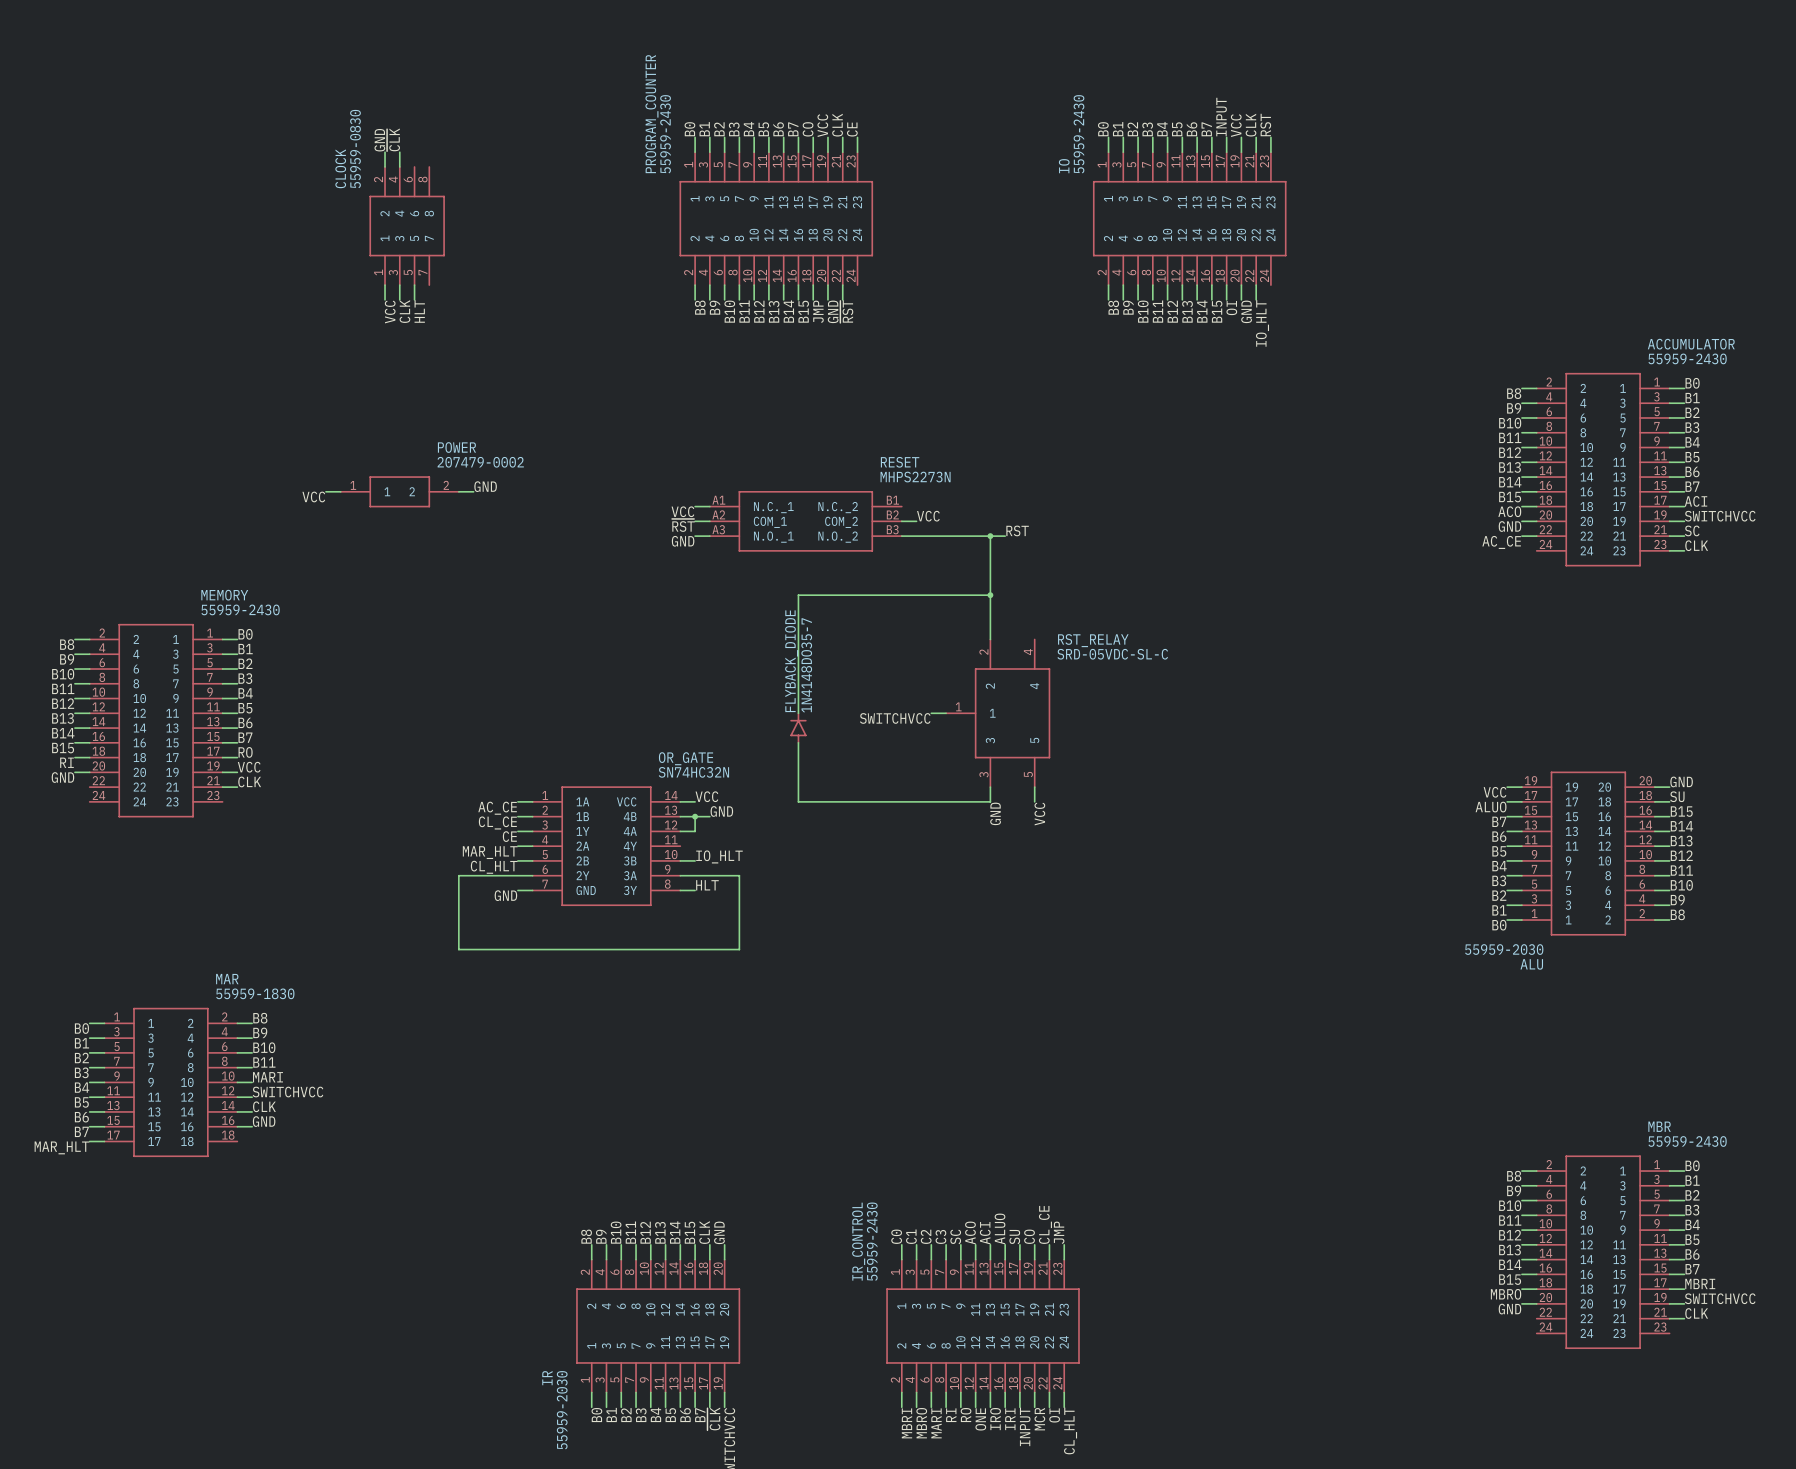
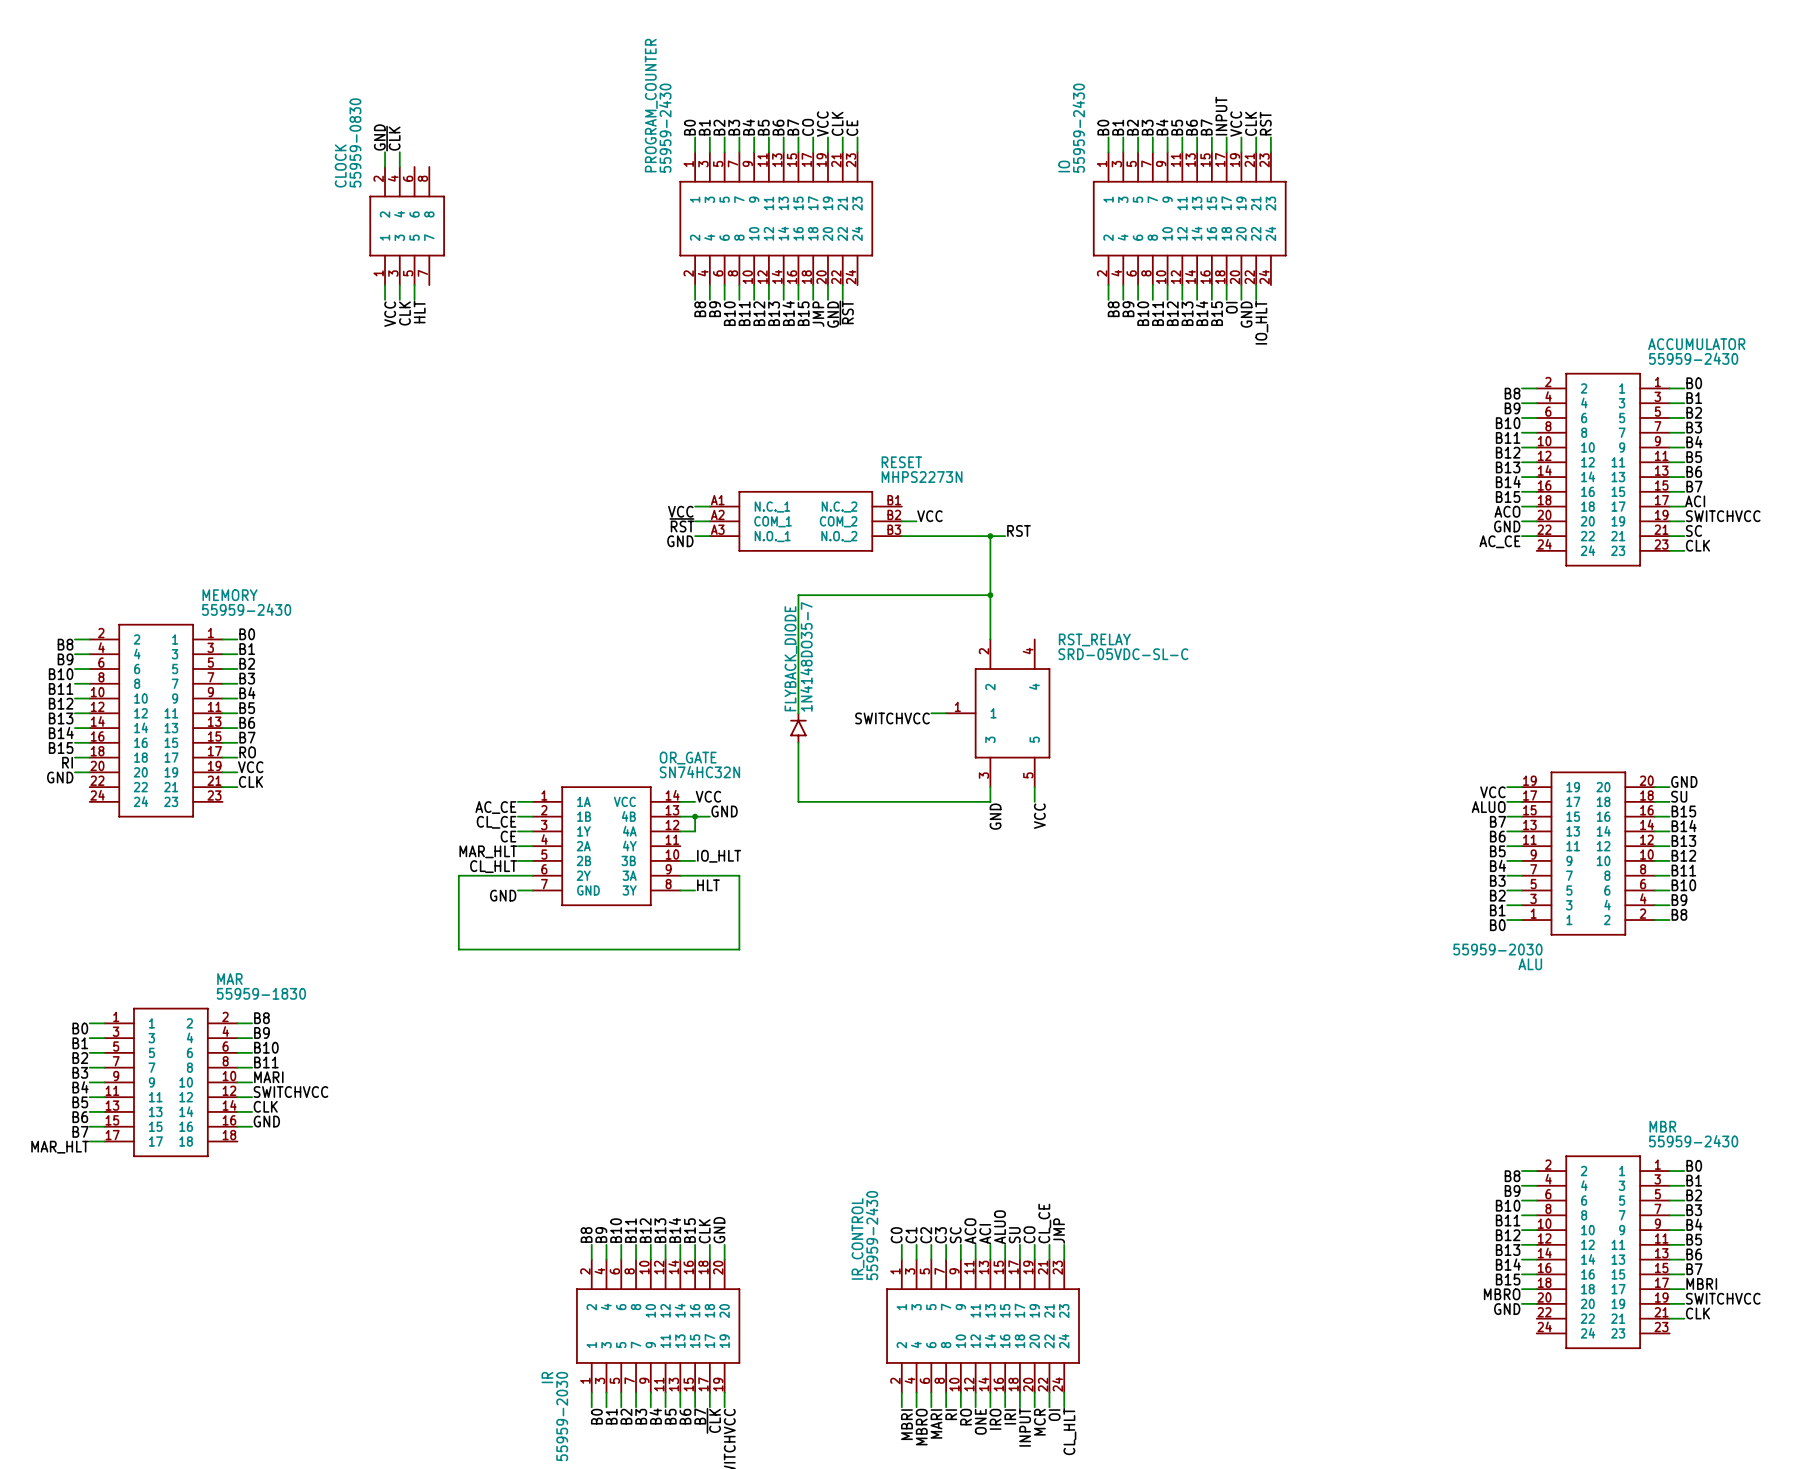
label: GND (485, 486) -> none
wire: (325, 491) (340, 491) -> none
POWER: 207479-0002 (399, 491) -> none
wire: (458, 491) (473, 491) -> none
label: VCC (313, 496) -> none

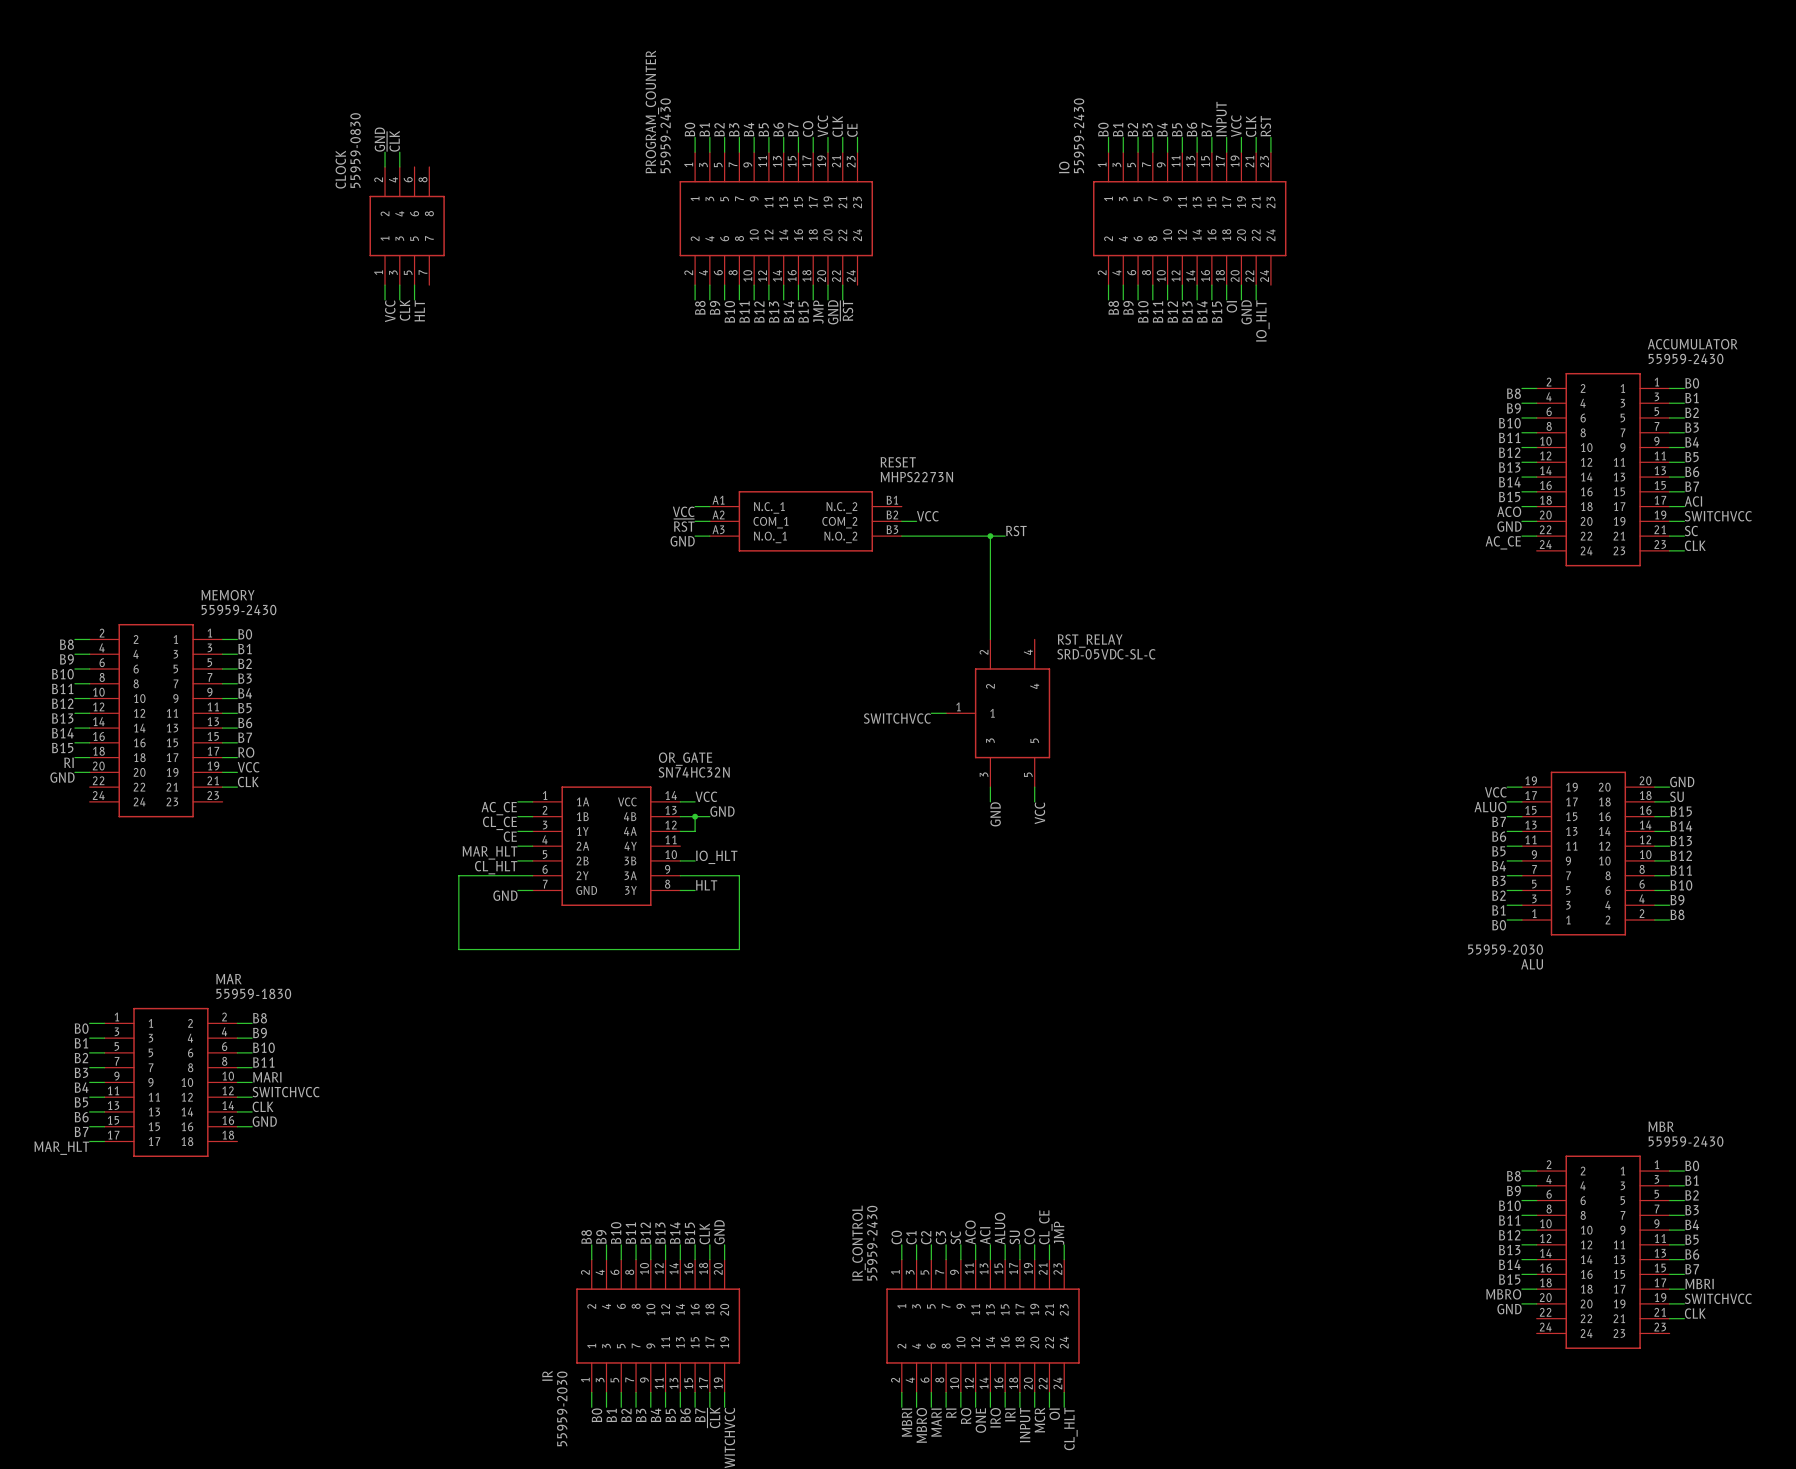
wire: (990, 595) (798, 595) (798, 713) -> none
junction: (990, 595) -> none
FLYBACK_DIODE: 1N4148DO35-7 (798, 728) -> none
wire: (798, 742) (798, 801) (990, 801) -> none

